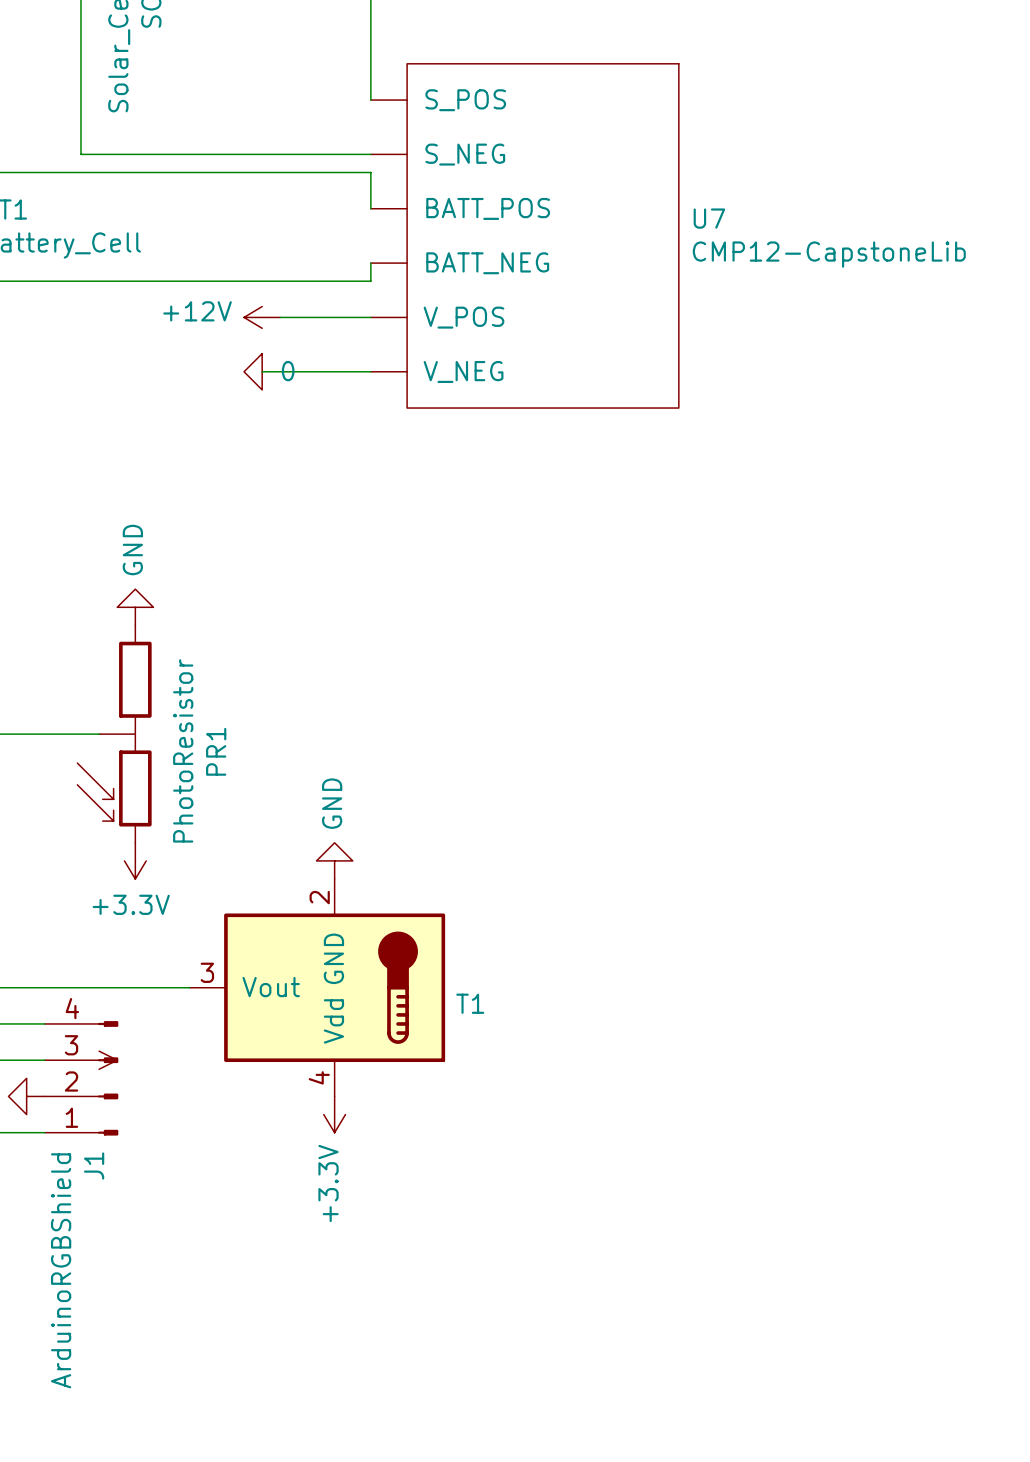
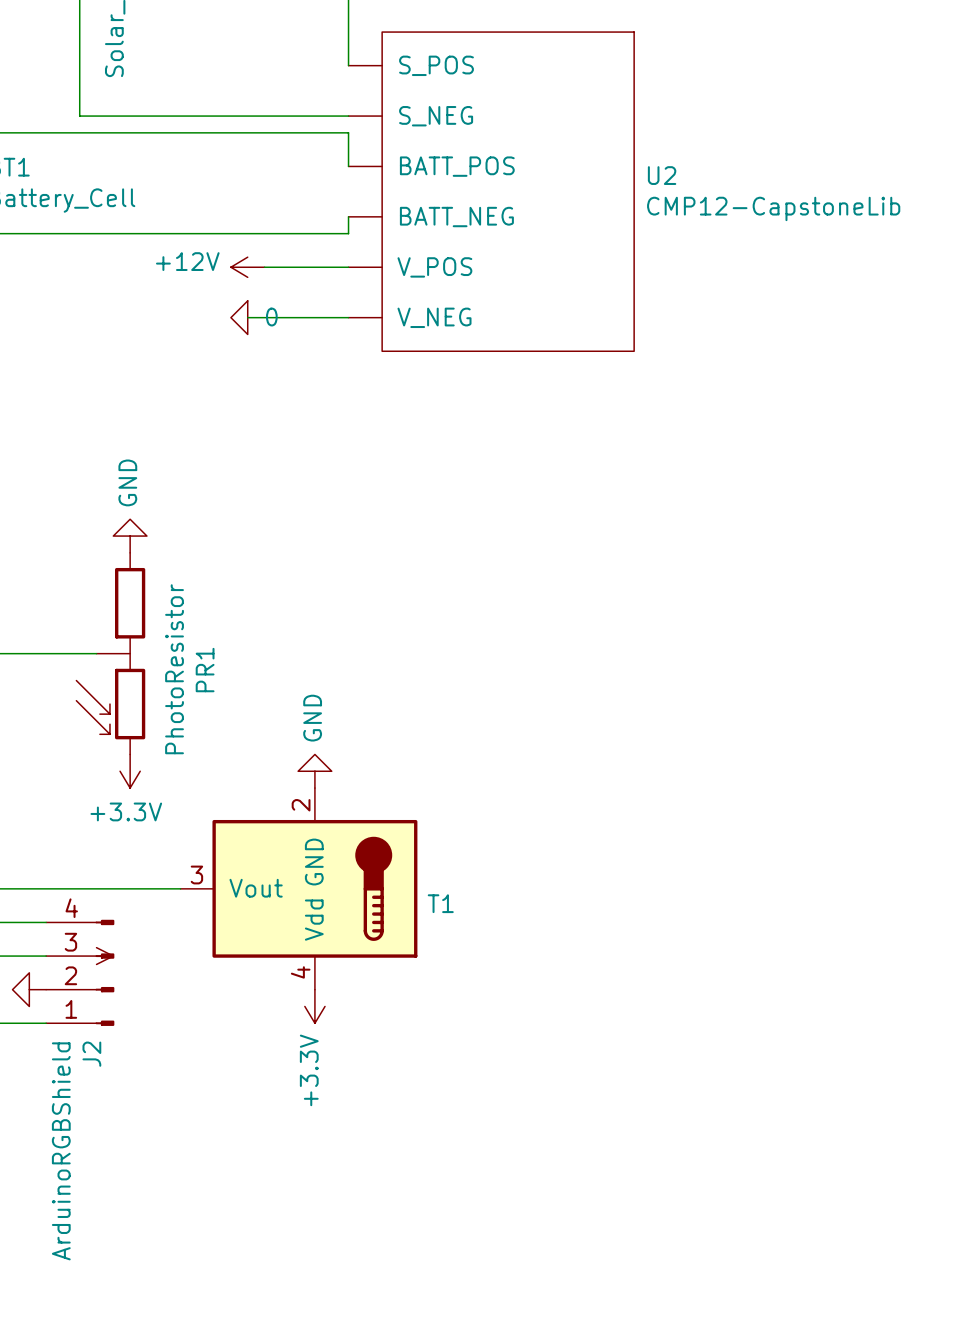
U7 name: U7 (709, 218) -> U2 (662, 175)
J1 name: J1 (94, 1166) -> J2 (91, 1054)

